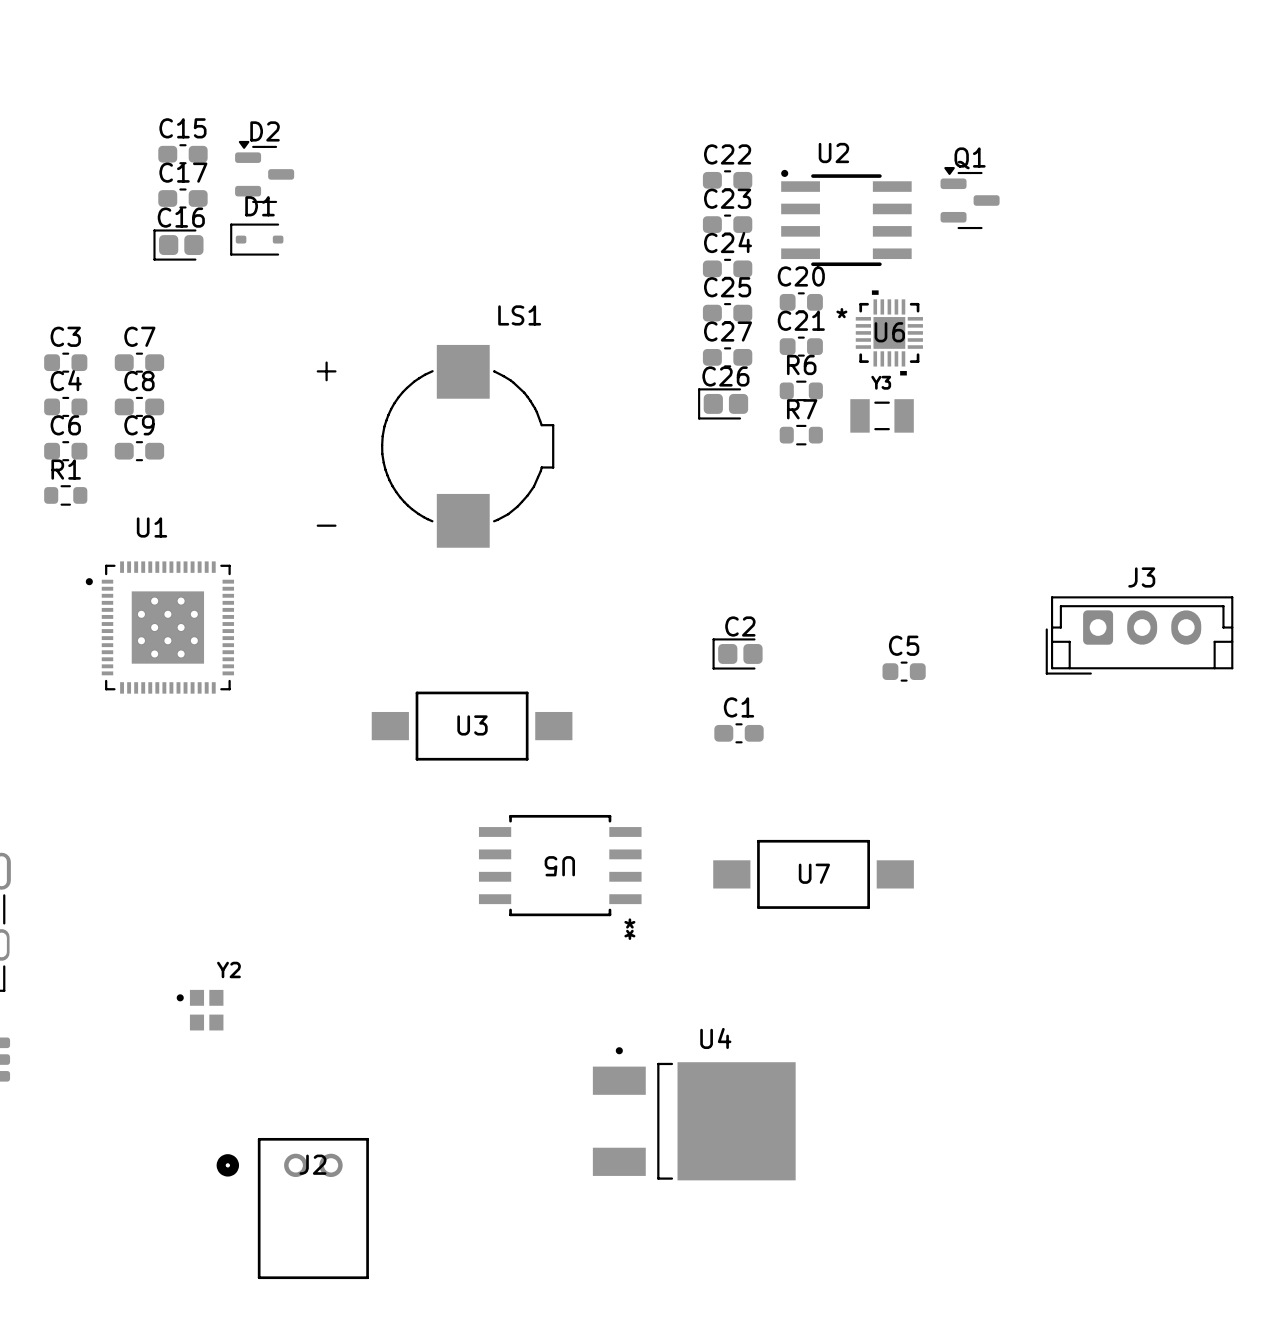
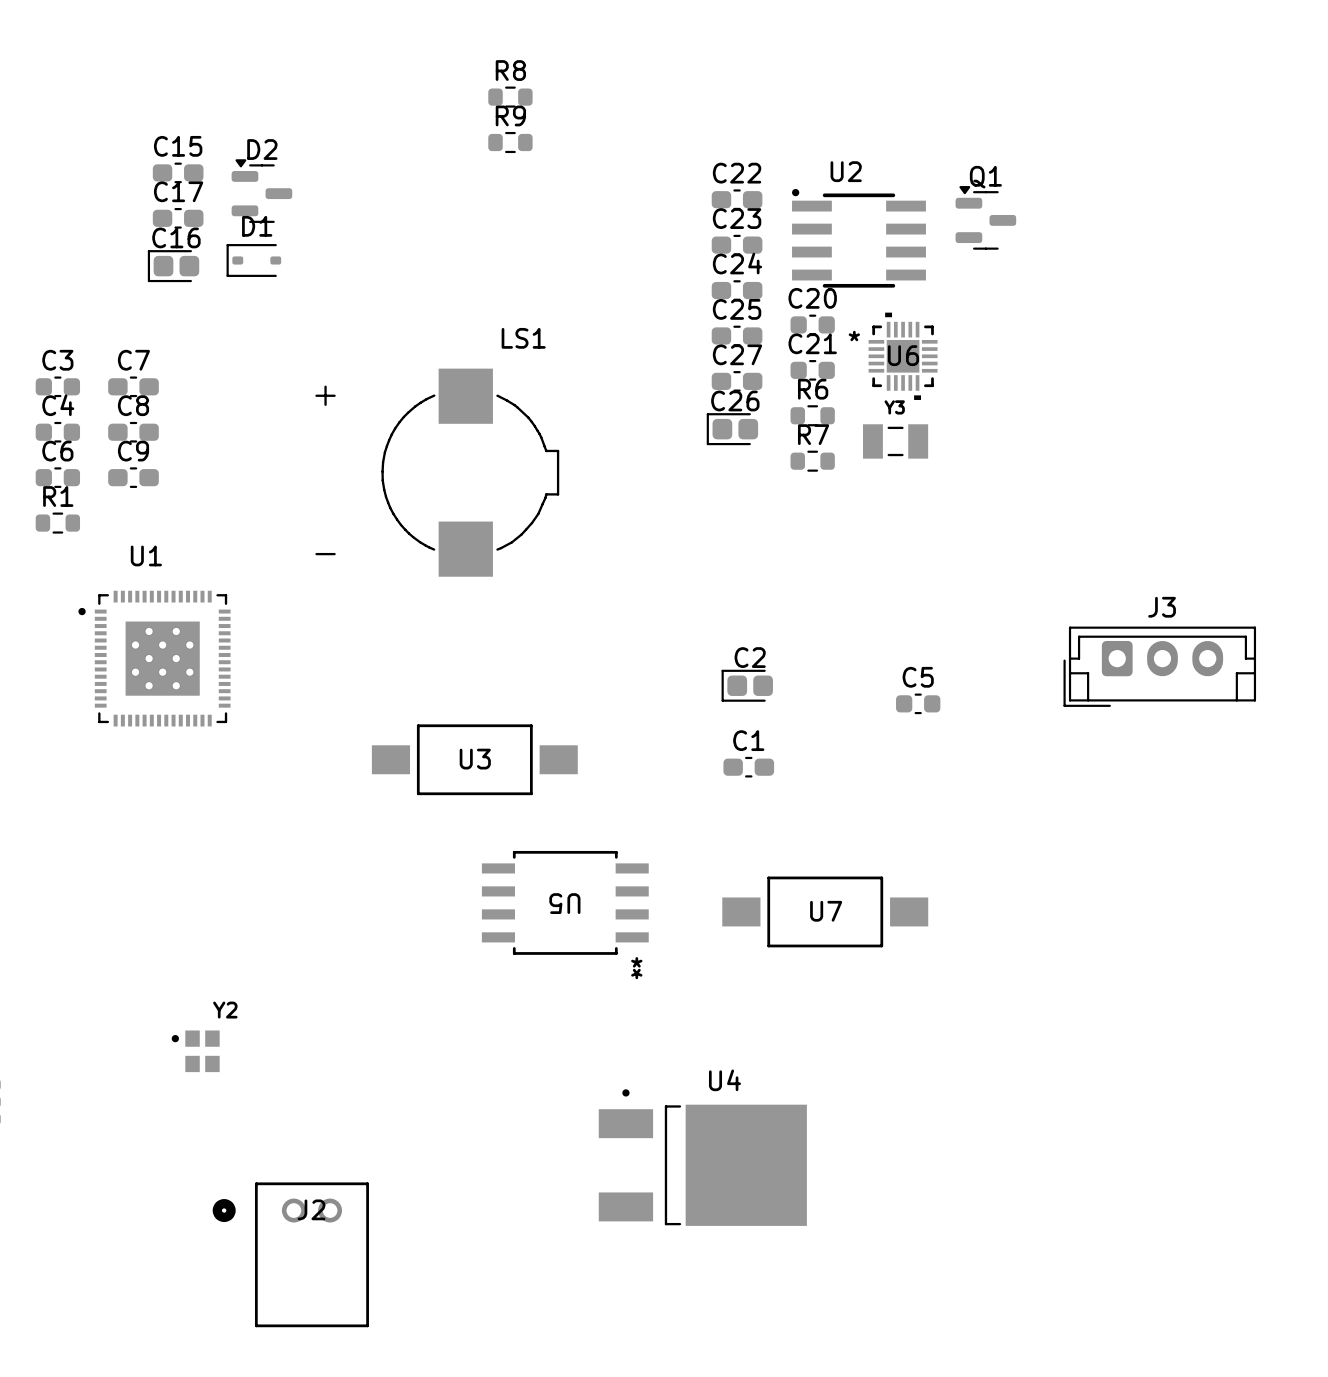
R8: none -> (510, 97)
R9: none -> (510, 142)

